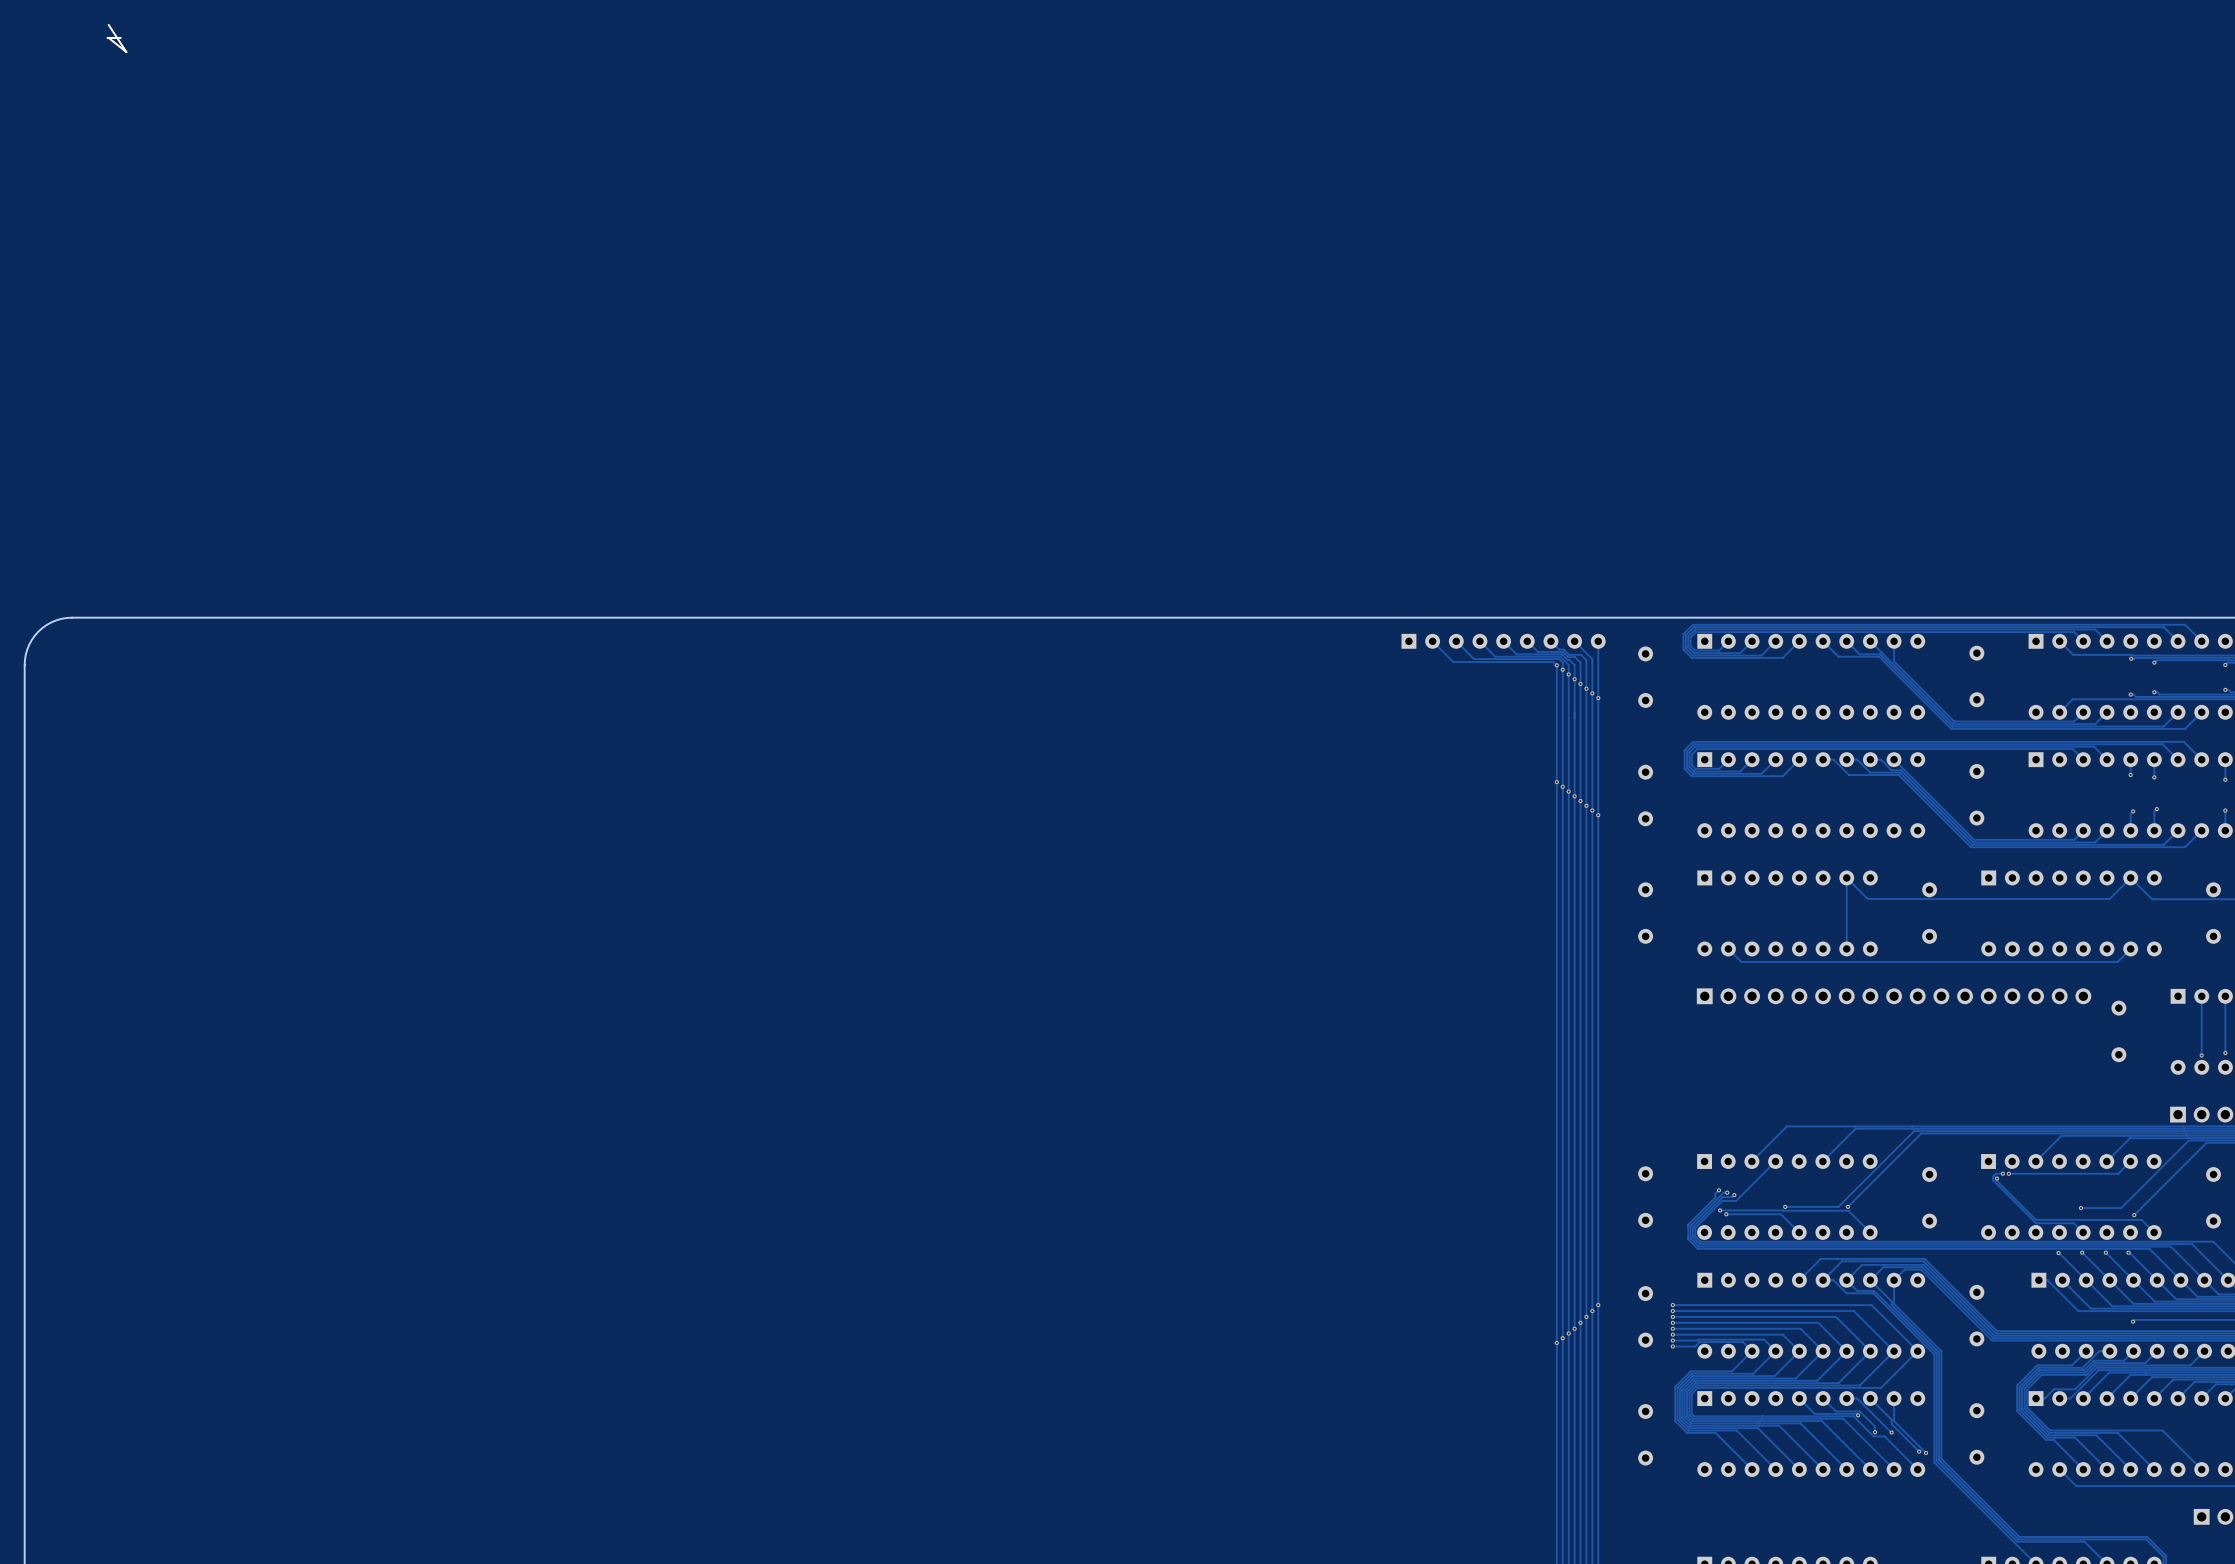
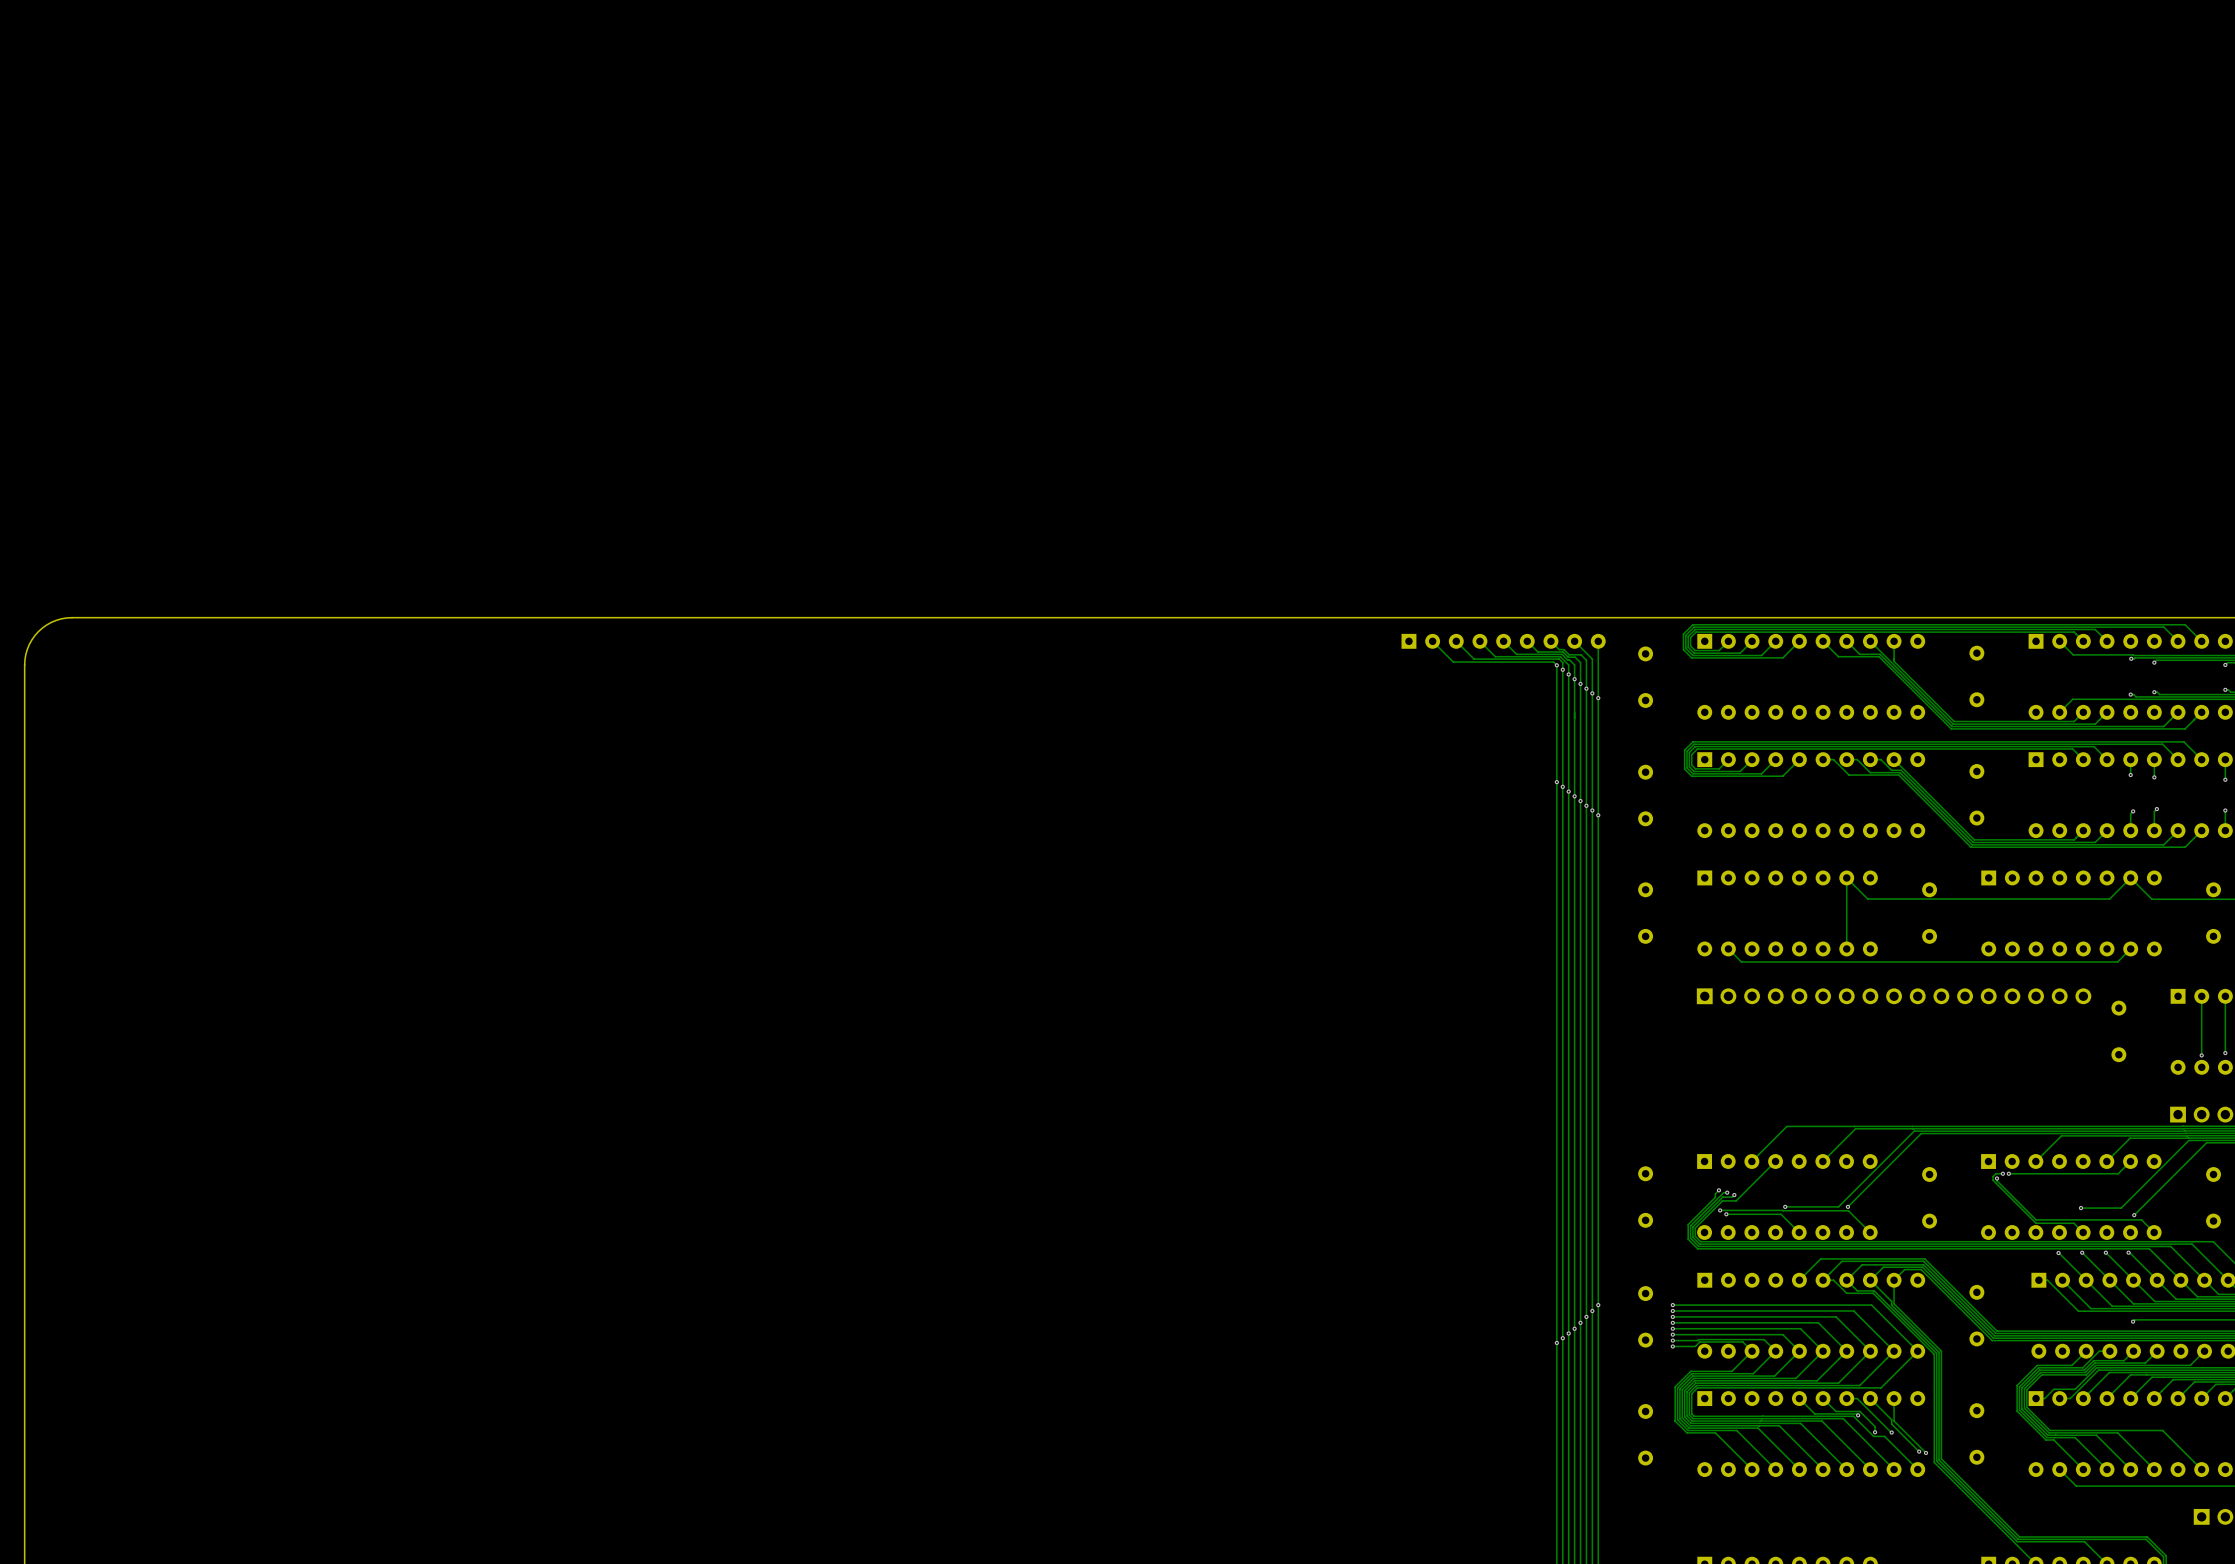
line: (108, 24) (126, 52) (108, 37) -> none
line: (120, 37) (107, 37) -> none

